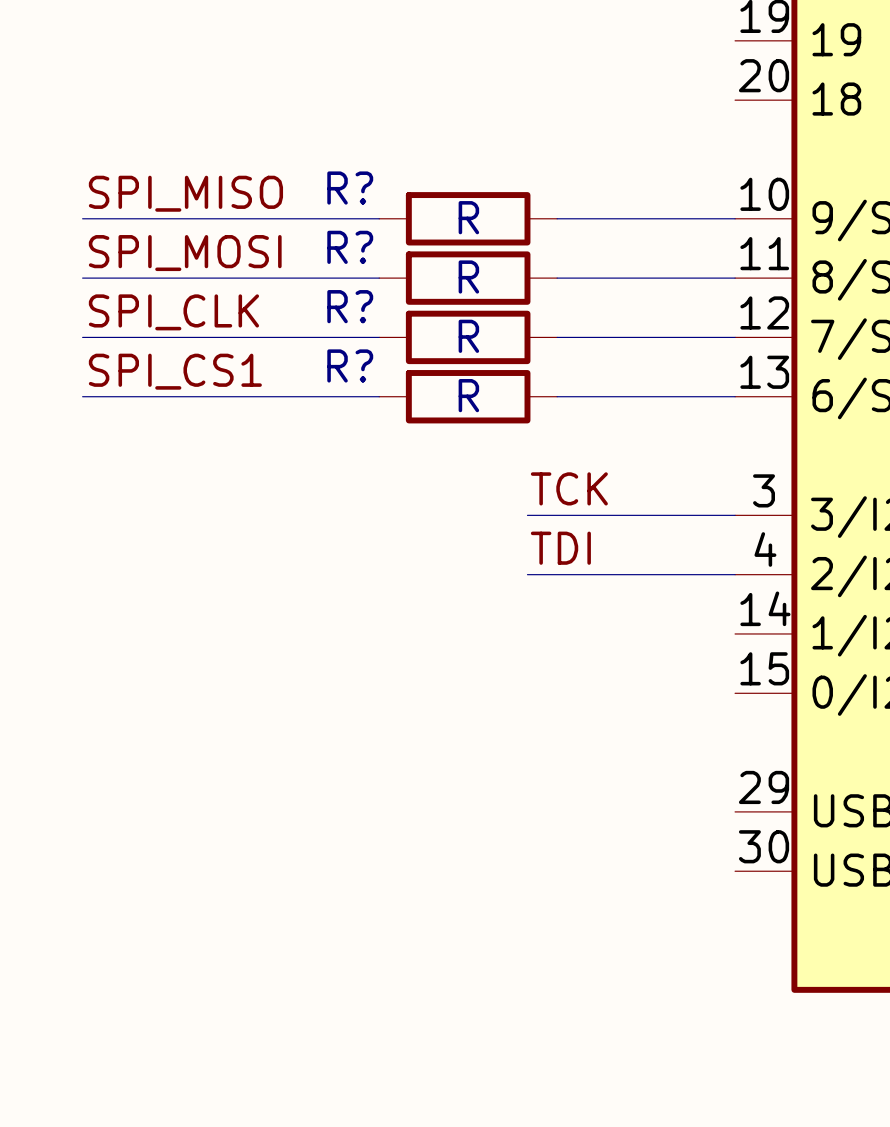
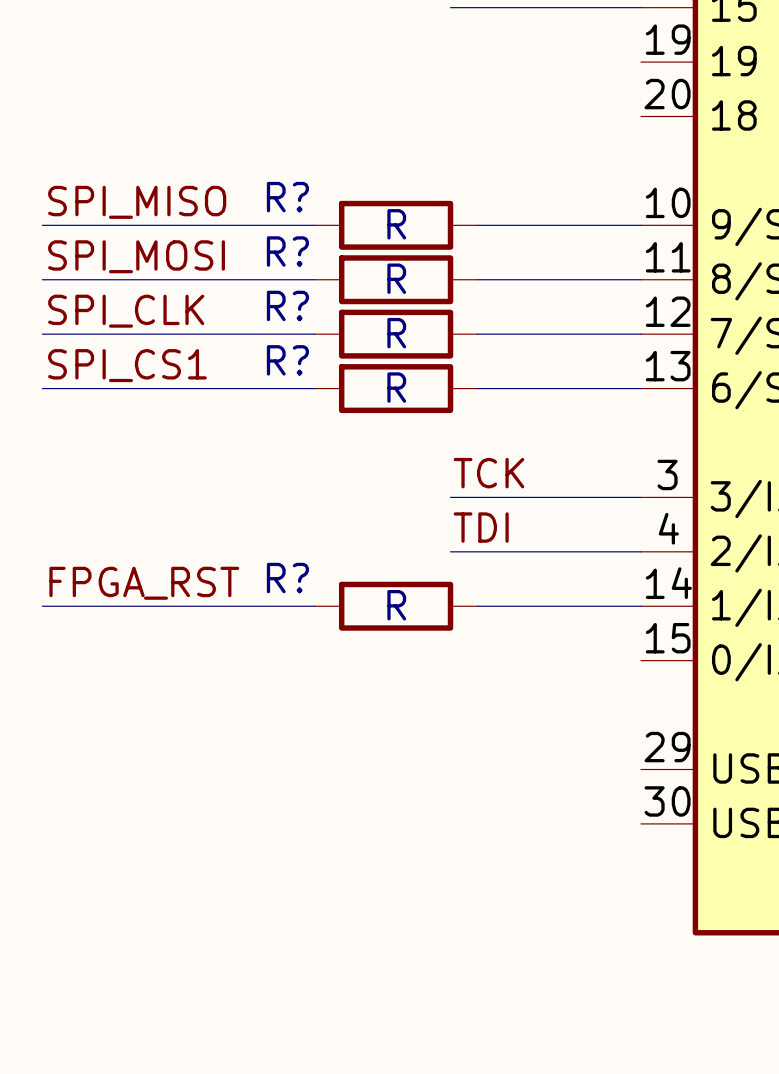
label: none -> FPGA_RST (144, 583)
wire: none -> (42, 606) (314, 606)
R?: none -> R (396, 606)
wire: none -> (477, 606) (640, 606)

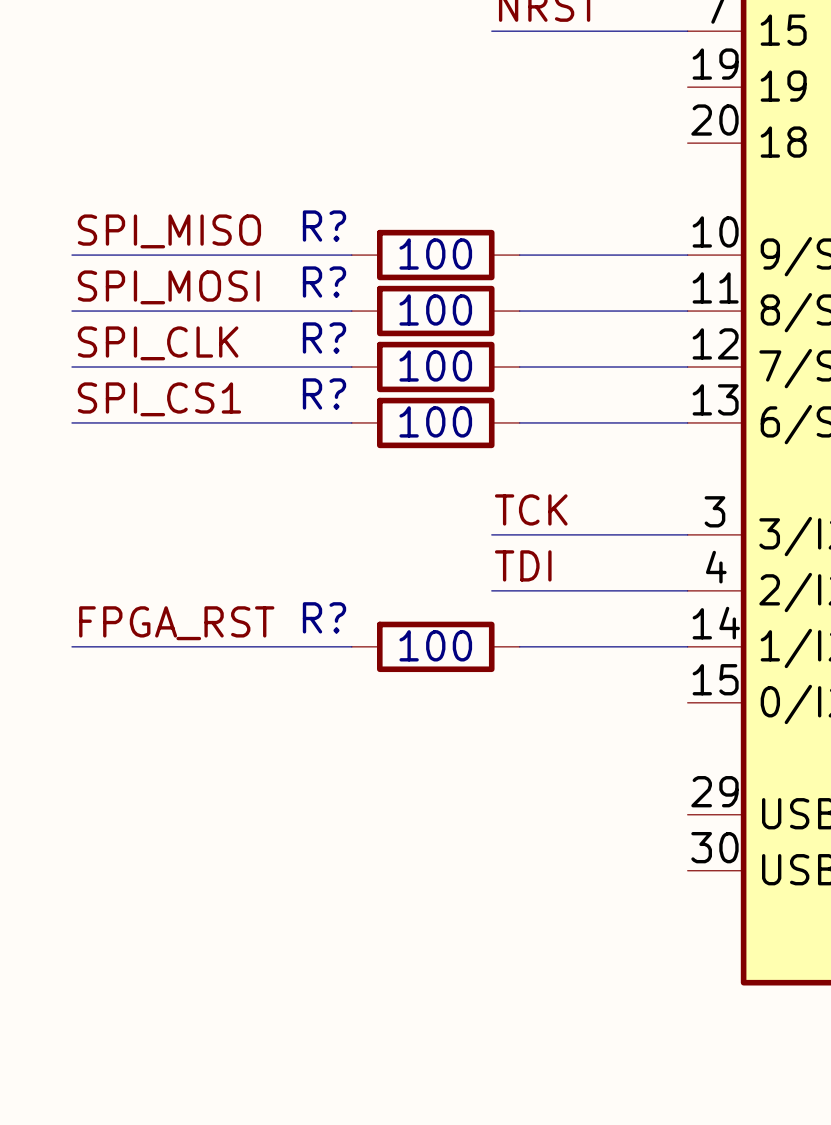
R? value: R (396, 224) -> 100 (435, 254)
R? value: R (396, 278) -> 100 (435, 309)
R? value: R (396, 333) -> 100 (435, 365)
R? value: R (396, 387) -> 100 (435, 421)
R? value: R (396, 605) -> 100 (435, 645)

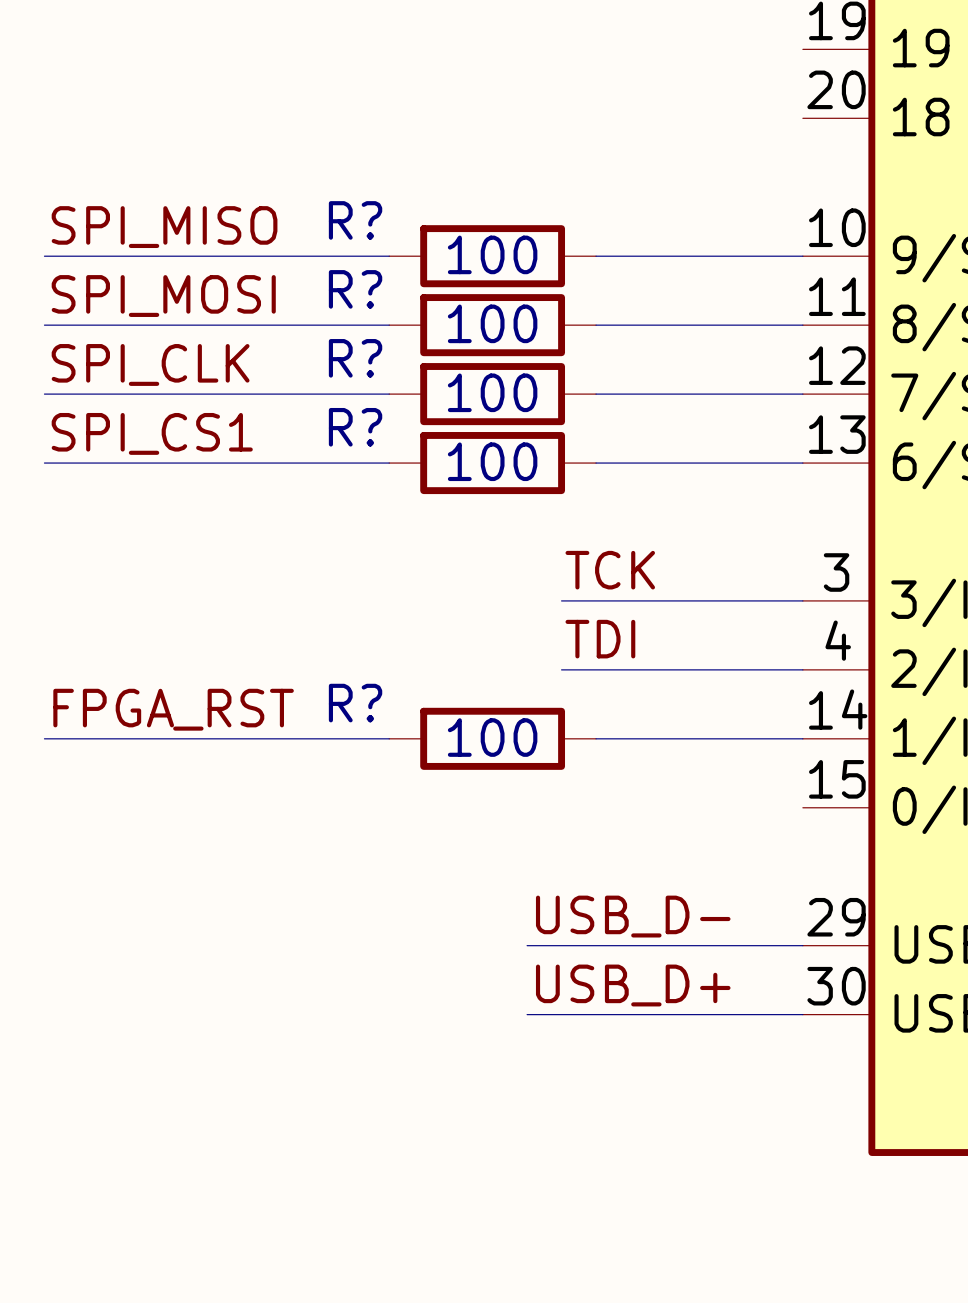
label: none -> USB_D- (633, 916)
wire: none -> (527, 945) (802, 945)
label: none -> USB_D+ (633, 985)
wire: none -> (527, 1014) (802, 1014)

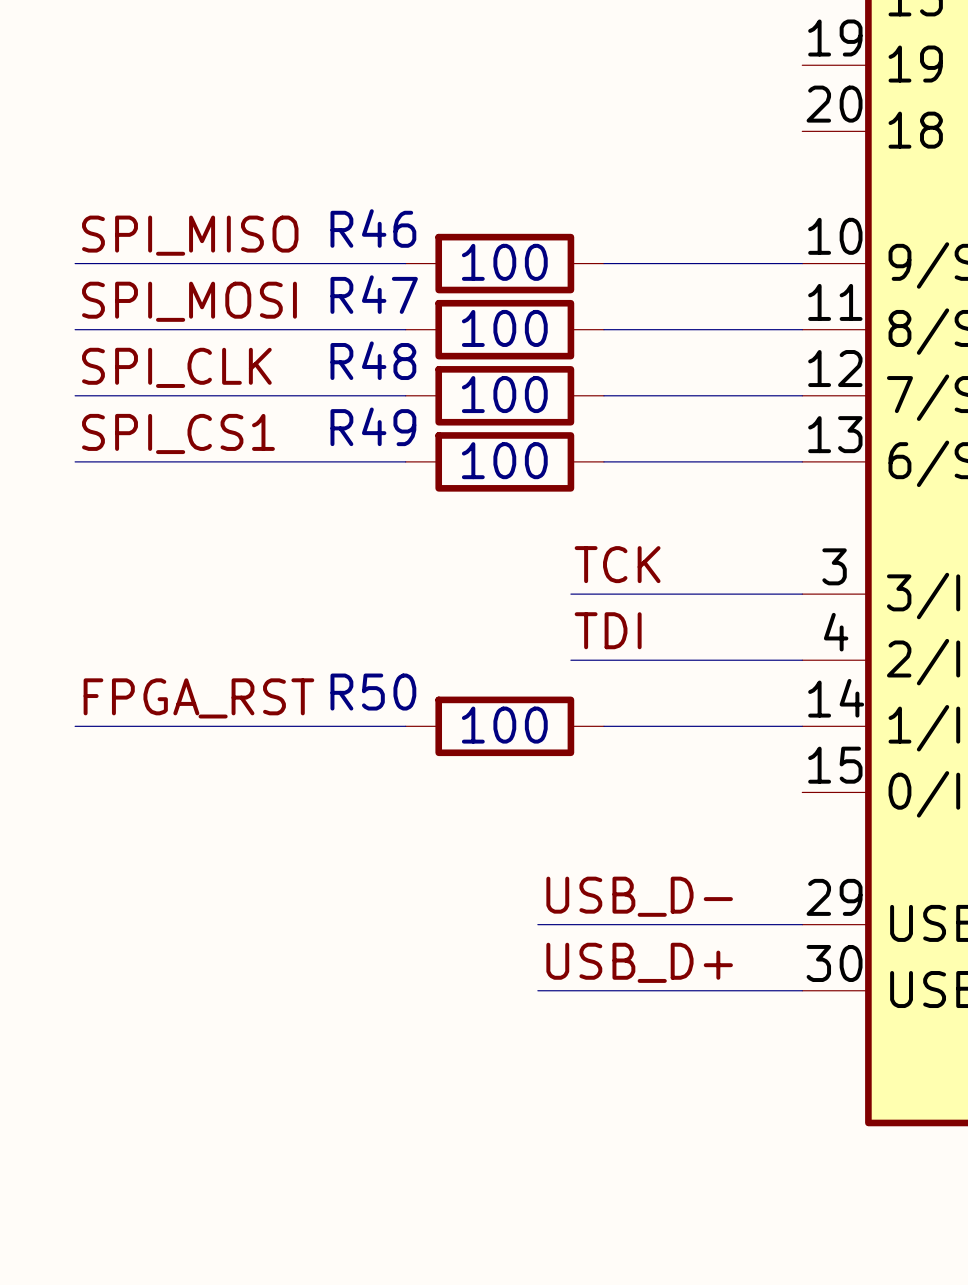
R? name: R? (355, 220) -> R46 (373, 228)
R? name: R? (355, 289) -> R47 (374, 294)
R? name: R? (355, 358) -> R48 (373, 360)
R? name: R? (355, 427) -> R49 (373, 426)
R? name: R? (355, 703) -> R50 (373, 692)

